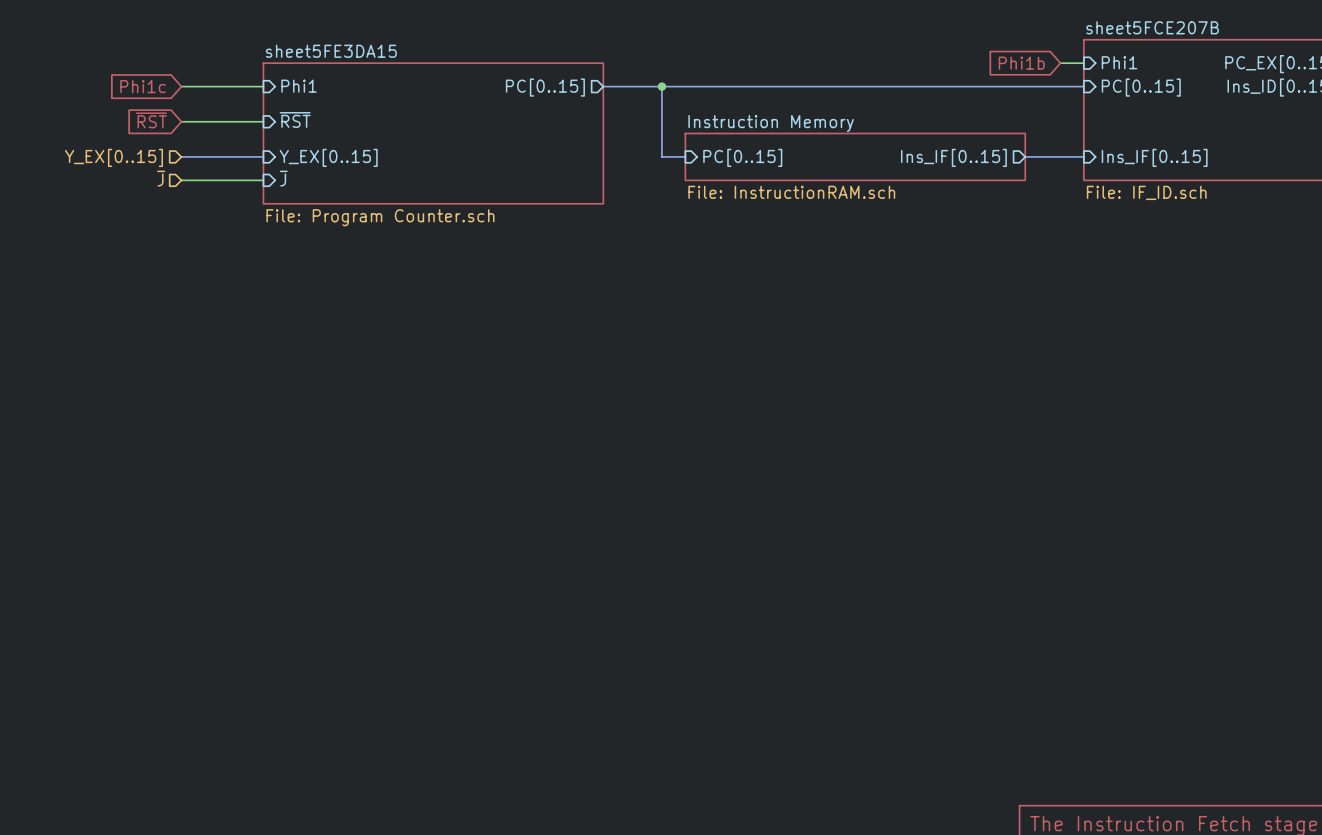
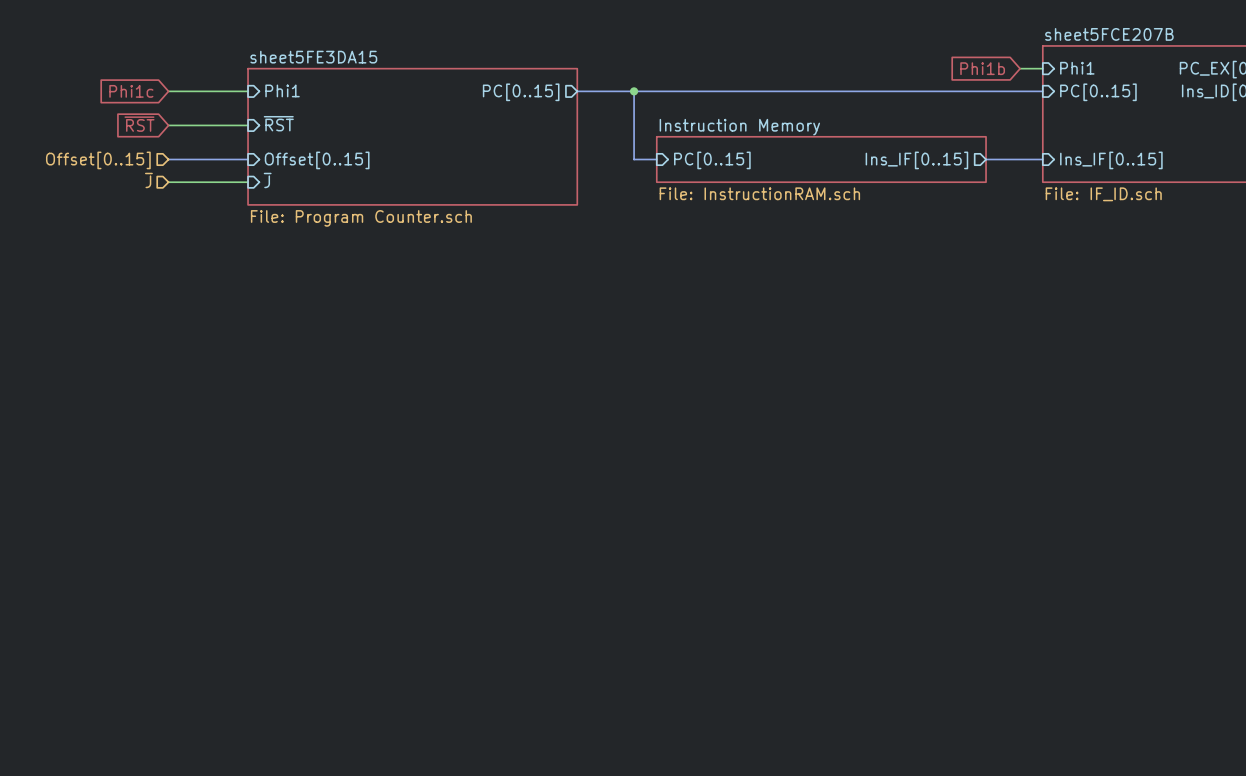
hierarchical label: Y_EX[0..15] (113, 157) -> Offset[0..15] (98, 160)
sheet pin: Y_EX[0..15] (328, 157) -> Offset[0..15] (317, 160)

